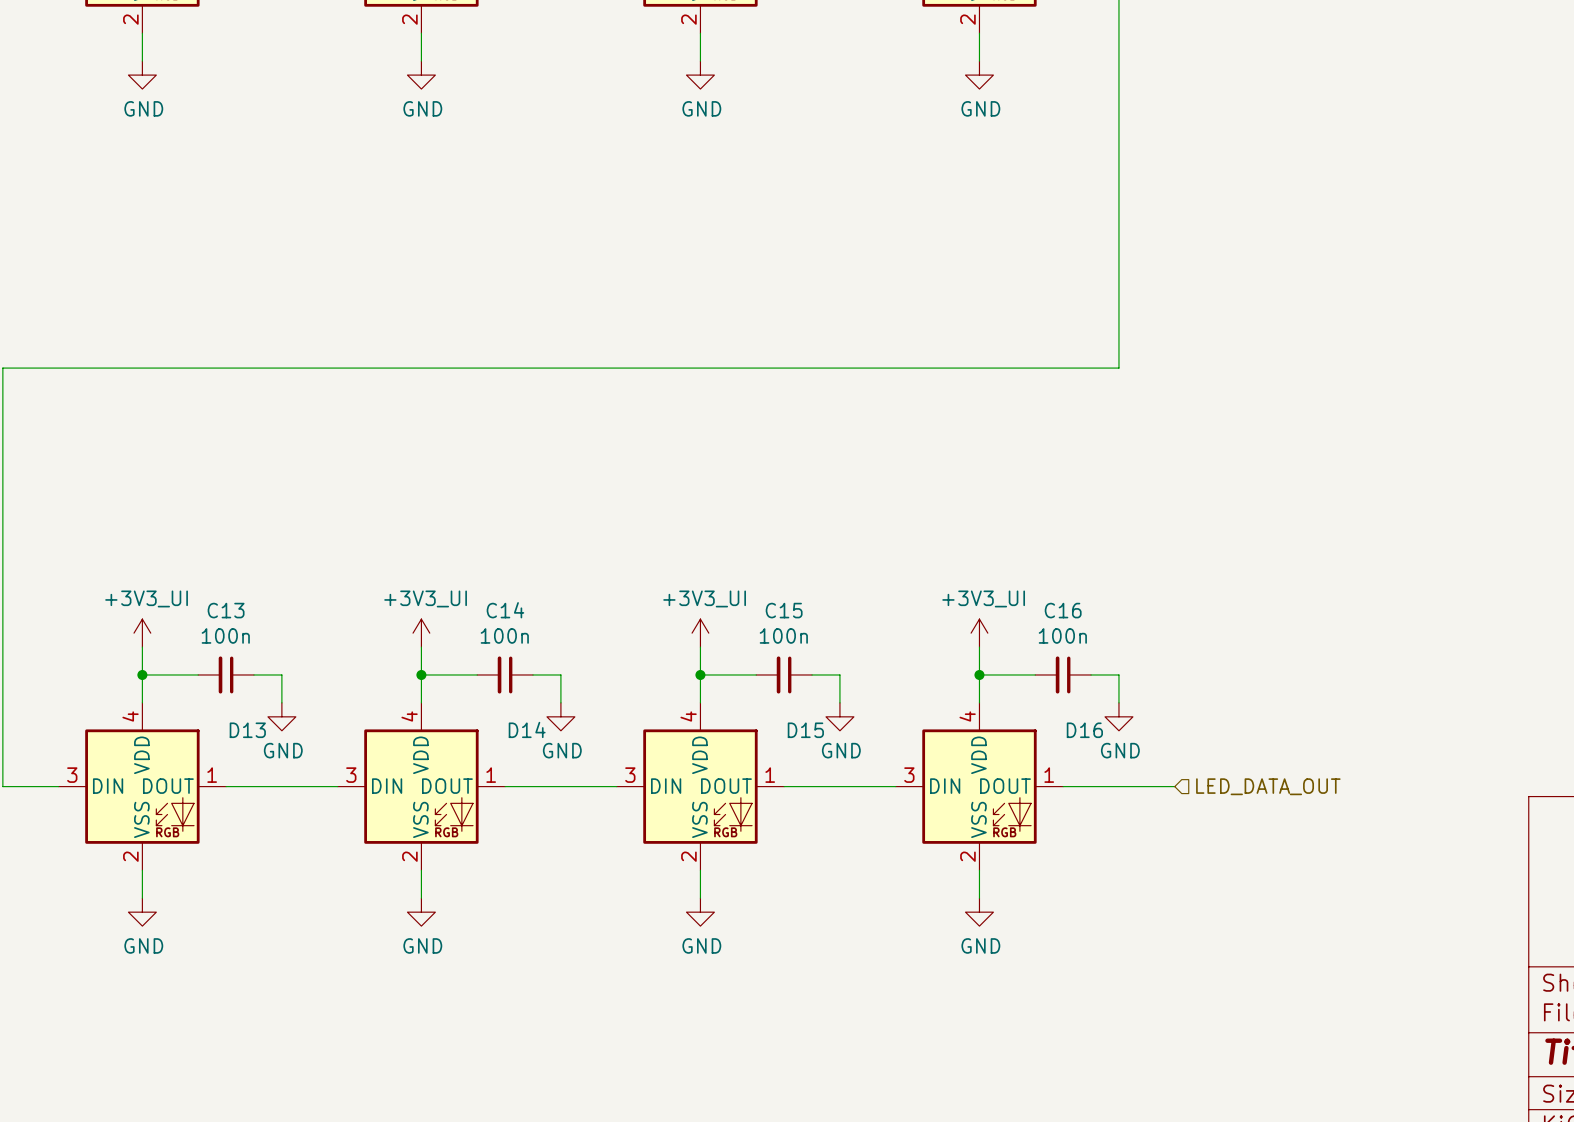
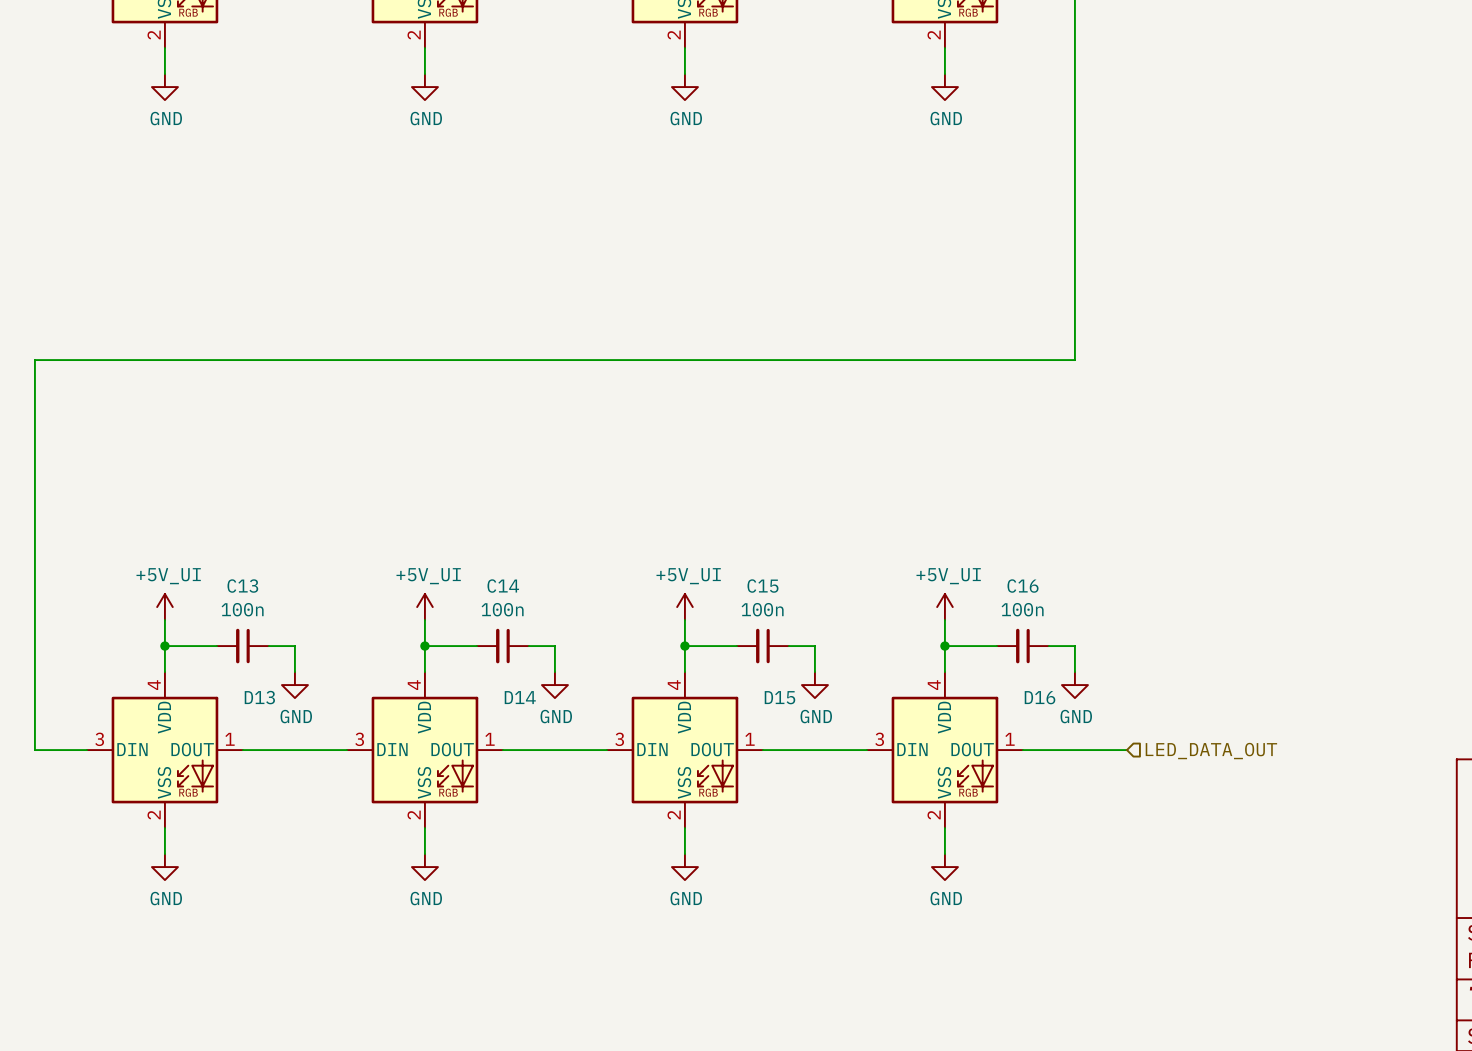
power symbol: +3V3_UI (142, 633) -> +5V_UI (164, 607)
power symbol: +3V3_UI (421, 633) -> +5V_UI (424, 607)
power symbol: +3V3_UI (700, 633) -> +5V_UI (684, 607)
power symbol: +3V3_UI (979, 633) -> +5V_UI (944, 607)

